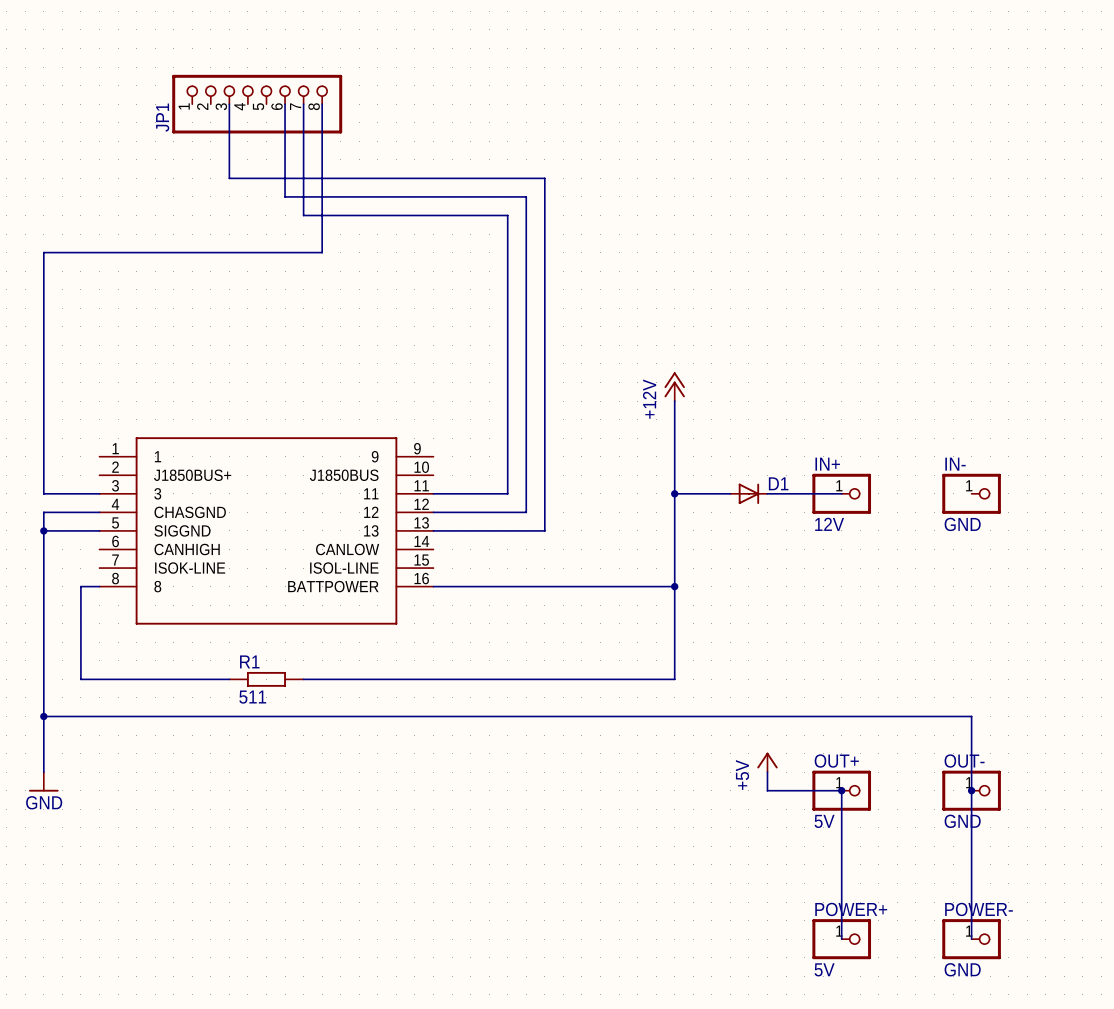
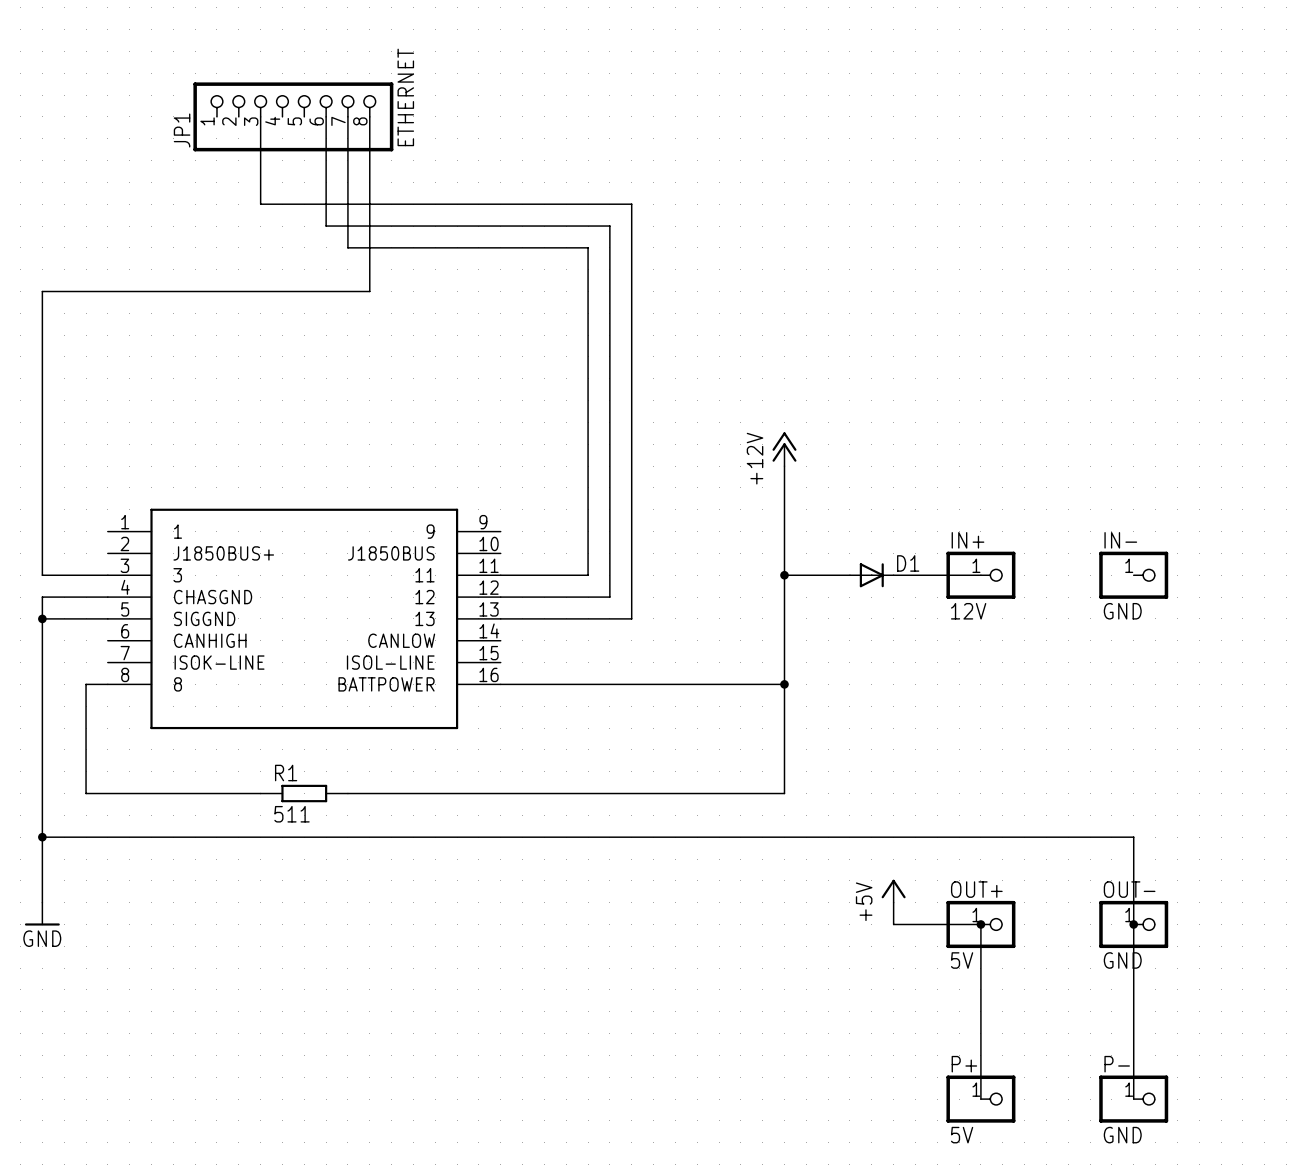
JP1 value: none -> ETHERNET (405, 97)
POWER+ name: POWER+ (851, 909) -> P+ (964, 1064)
POWER- name: POWER- (979, 909) -> P- (1117, 1064)

